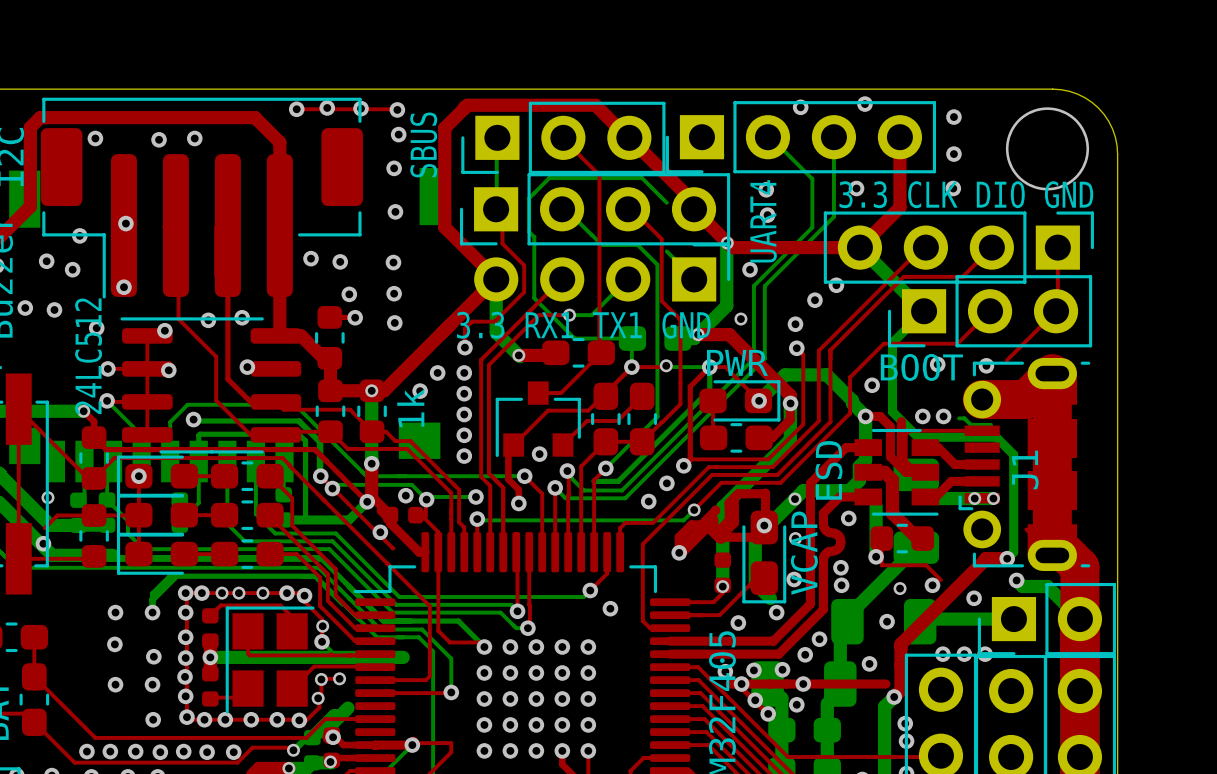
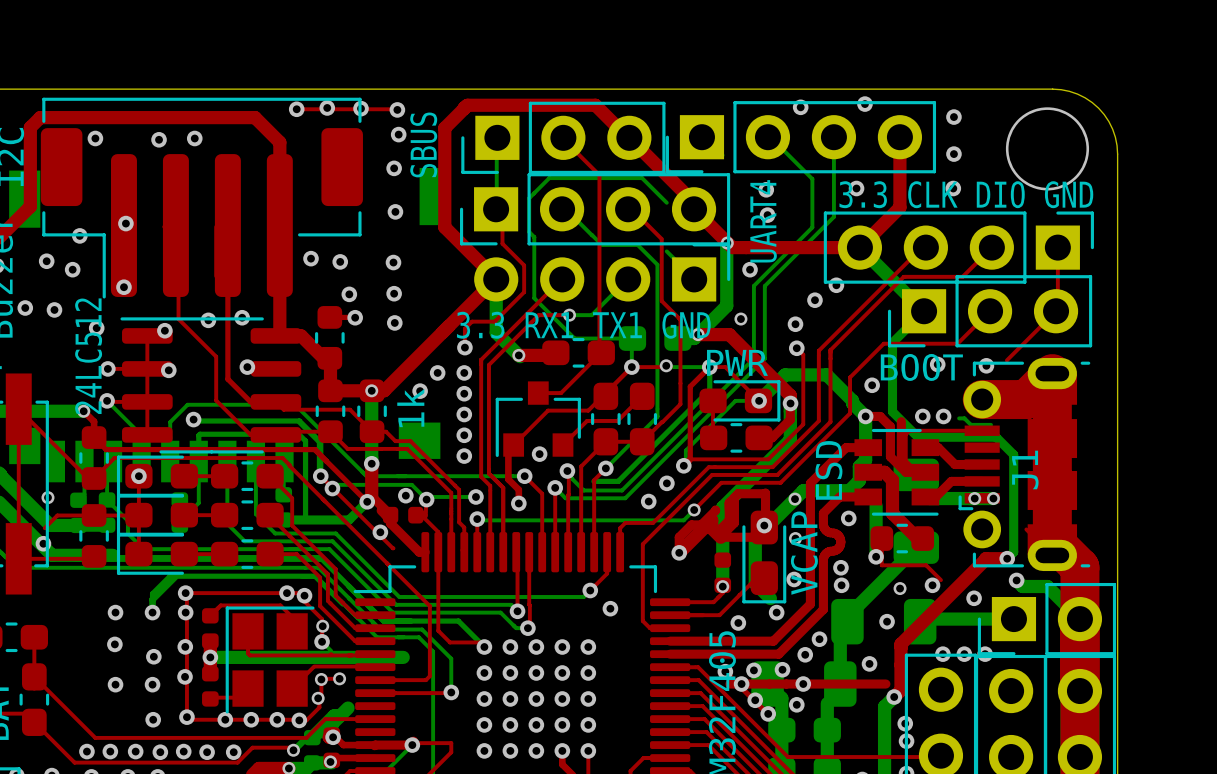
bottom track: none -> (759, 400) (735, 400) (685, 450) (685, 463) (683, 465)
via: (201, 593) -> none
via: (222, 593) -> none
via: (238, 593) -> none
via: (262, 593) -> none
via: (185, 637) -> none
via: none -> (185, 646)
via: (185, 658) -> none
via: (185, 696) -> none
via: (204, 719) -> none

